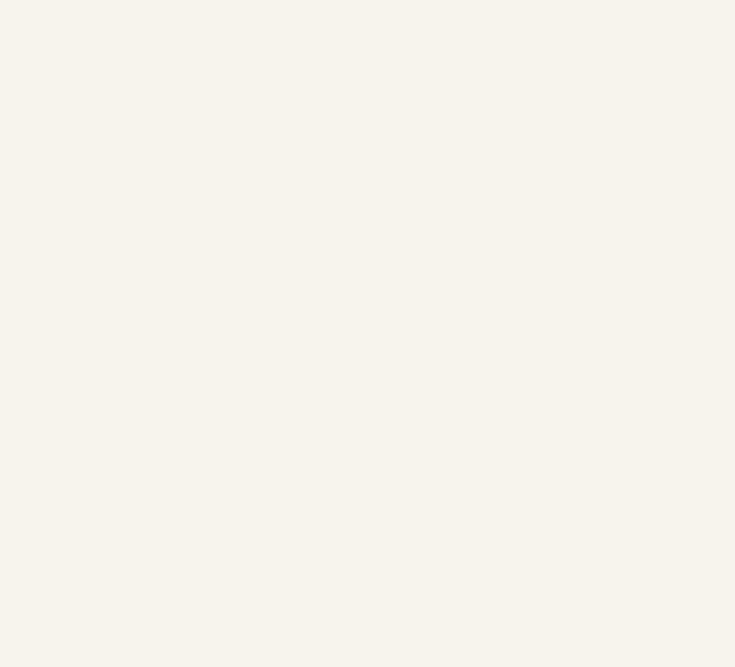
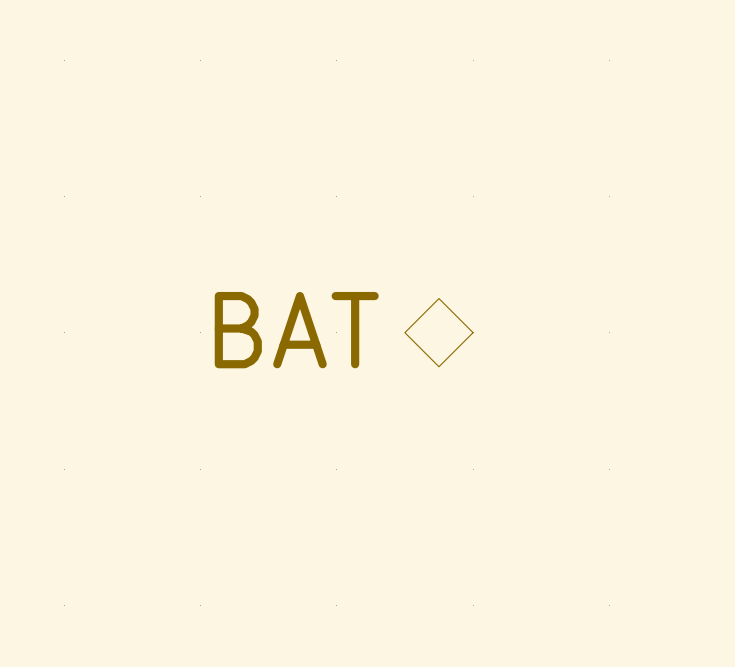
hierarchical label: none -> BAT (296, 330)

